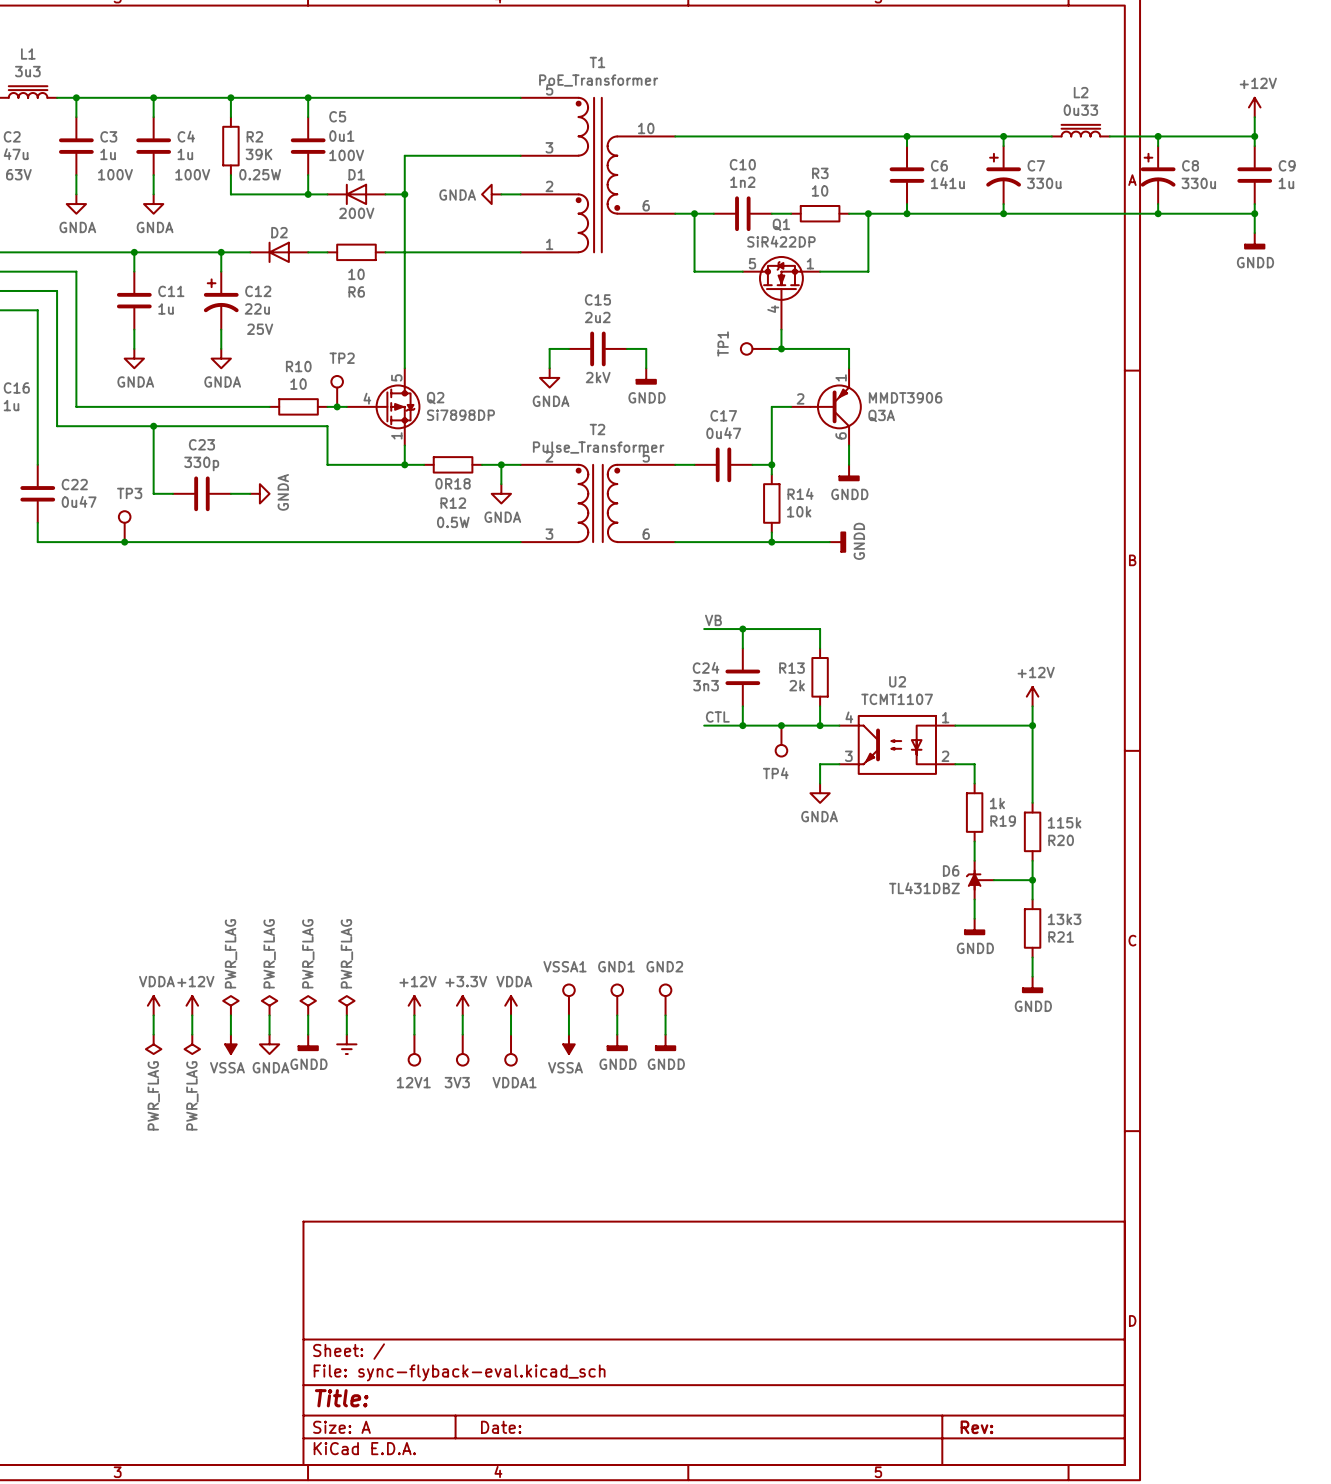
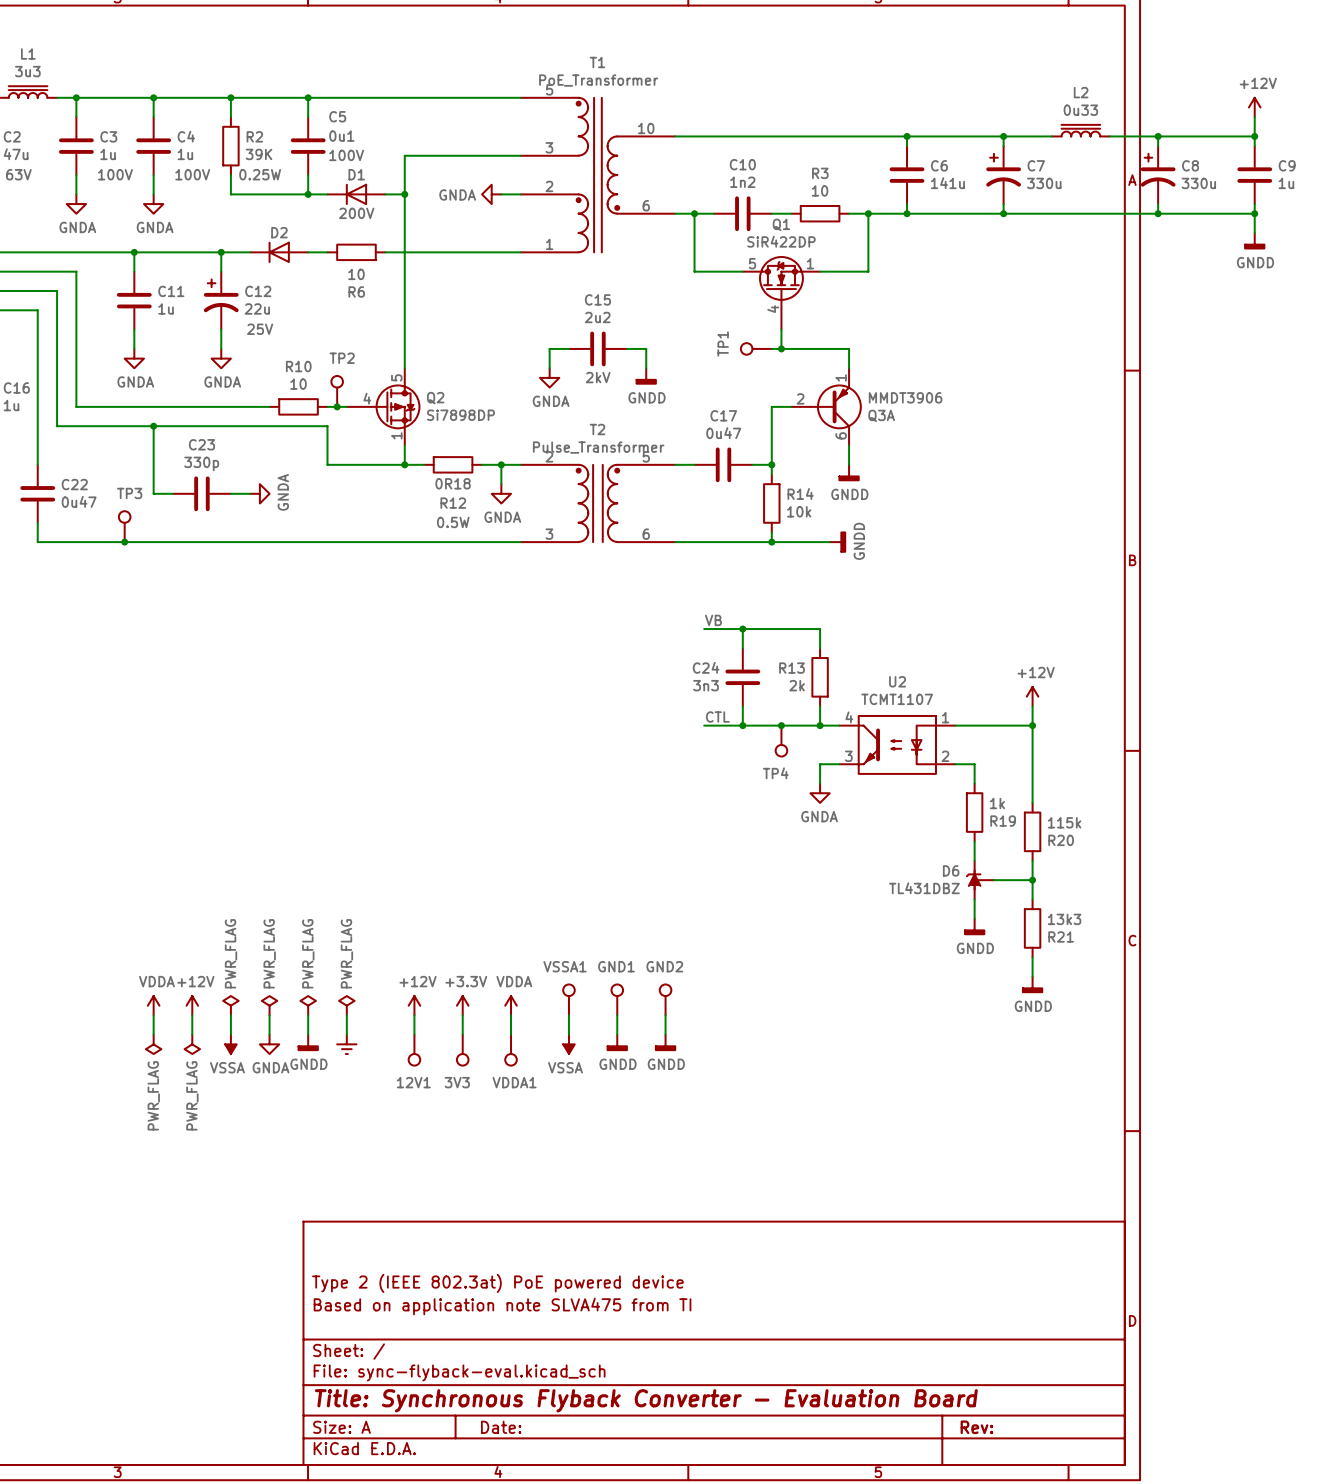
title block: none -> Type 2 (IEEE 802.3at) PoE powered device (497, 1283)
title block: none -> Based on application note SLVA475 from TI (502, 1306)
title block: Title: (341, 1398) -> Title: Synchronous Flyback Converter - Evaluation Board (646, 1400)

